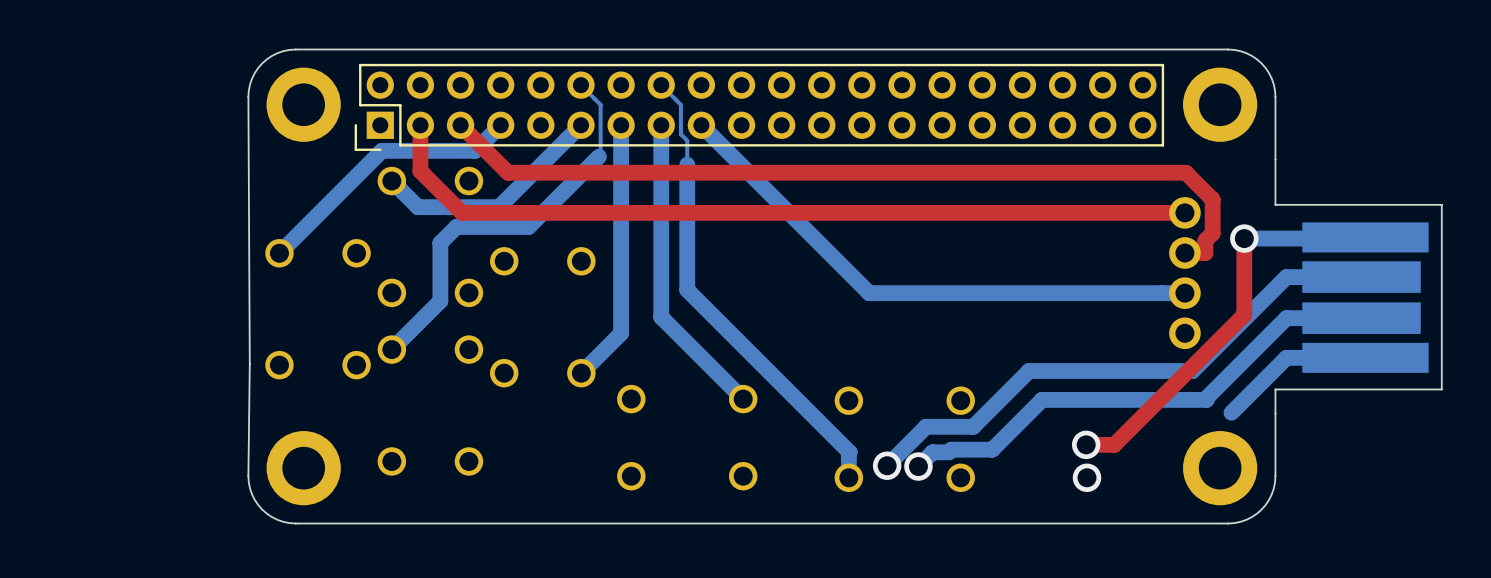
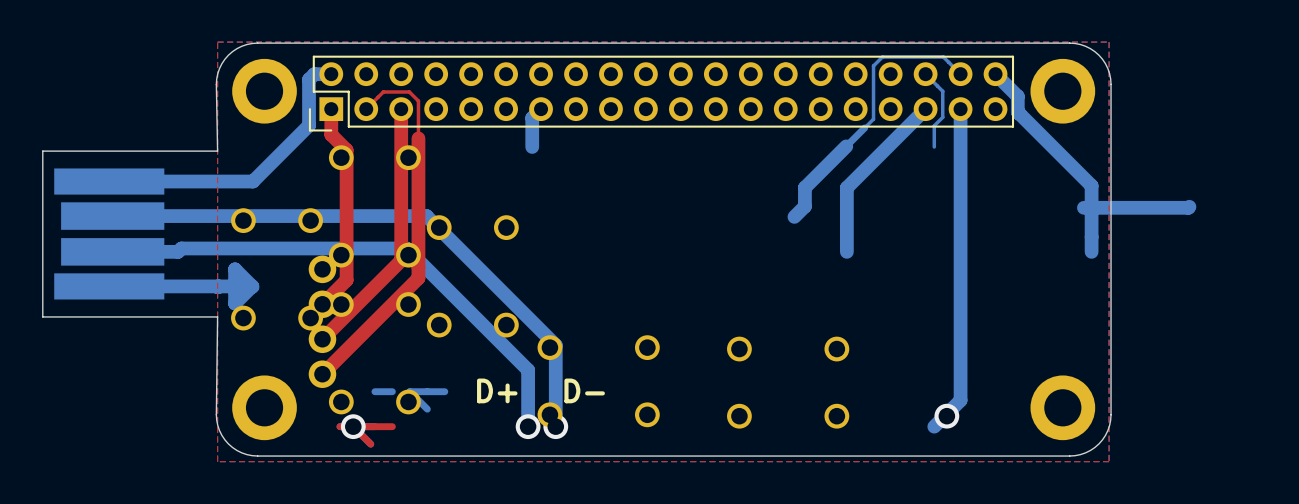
top zone outline: none -> (217, 42) (1109, 42) (1109, 461) (217, 461) (217, 42)
bottom track: none -> (331, 74) (314, 74) (309, 79) (309, 125) (252, 181) (109, 181)
bottom track: (580, 85) (600, 104) (600, 155) (528, 226) (456, 226) (440, 243) (440, 301) (391, 349) -> none
bottom track: (661, 85) (680, 104) (680, 134) (687, 140) (687, 289) (849, 452) (848, 477) -> none
bottom track: none -> (925, 74) (942, 91) (942, 117) (934, 125) (934, 146)
bottom track: none -> (960, 74) (943, 57) (882, 57) (873, 65) (873, 119) (804, 187) (804, 206) (794, 216)
bottom track: none -> (995, 74) (1017, 96) (1017, 112) (1091, 185) (1091, 251)
board edge: (248, 96) (249, 363) -> (216, 84) (217, 151) (42, 151) (42, 316) (217, 316)
top track: none -> (331, 109) (331, 134) (346, 150) (346, 280) (322, 304)
top track: (420, 125) (420, 171) (462, 212) (1184, 212) -> (366, 109) (383, 92) (409, 92) (418, 101) (418, 278) (322, 374)
top track: (460, 125) (508, 172) (1185, 172) (1212, 199) (1212, 233) (1205, 240) (1205, 253) (1189, 253) -> (401, 109) (401, 260) (322, 339)
bottom track: (500, 125) (475, 150) (381, 150) (279, 253) -> none
bottom track: (580, 125) (499, 207) (417, 207) (391, 181) -> none
bottom track: (621, 125) (621, 333) (581, 373) -> (541, 109) (532, 117) (532, 146)
bottom track: (661, 125) (661, 317) (743, 399) -> none
bottom track: (701, 125) (869, 293) (1184, 293) -> none
bottom track: none -> (925, 109) (846, 187) (846, 251)
bottom track: none -> (960, 109) (960, 400) (934, 426)
board edge: (1275, 204) (1441, 204) (1441, 389) (1275, 389) -> (1111, 178) (1111, 339)
top track: (1244, 238) (1244, 314) (1114, 444) (1086, 444) -> none
via: (1244, 238) -> none
bottom track: none -> (112, 216) (426, 216) (555, 345) (555, 426)
part: none -> (109, 233)
part: (1184, 273) -> none
bottom track: (1361, 277) (1286, 277) (1192, 371) (1029, 371) (973, 426) (926, 426) (887, 465) -> none
bottom track: none -> (112, 251) (178, 251) (181, 248) (406, 248) (528, 370) (528, 426)
part: (1365, 297) -> none
bottom track: (1361, 318) (1286, 318) (1206, 399) (1042, 399) (992, 449) (951, 449) (948, 452) (932, 452) (918, 466) -> none
bottom track: none -> (109, 286) (218, 287) (218, 286) (252, 286) (235, 303) (235, 269) (252, 286)
bottom track: (1365, 357) (1286, 357) (1231, 412) -> none
part: none -> (322, 321)
via: (1086, 444) -> none
text: none -> D+ (497, 390)
text: none -> D- (584, 390)
bottom track: none -> (374, 391) (392, 391)
bottom track: none -> (444, 391) (409, 391) (427, 409)
via: (887, 465) -> none
via: (918, 466) -> none
top track: none -> (339, 426) (392, 426)
top track: none -> (353, 426) (370, 444)
via: none -> (353, 426)
via: none -> (528, 426)
via: none -> (555, 426)

